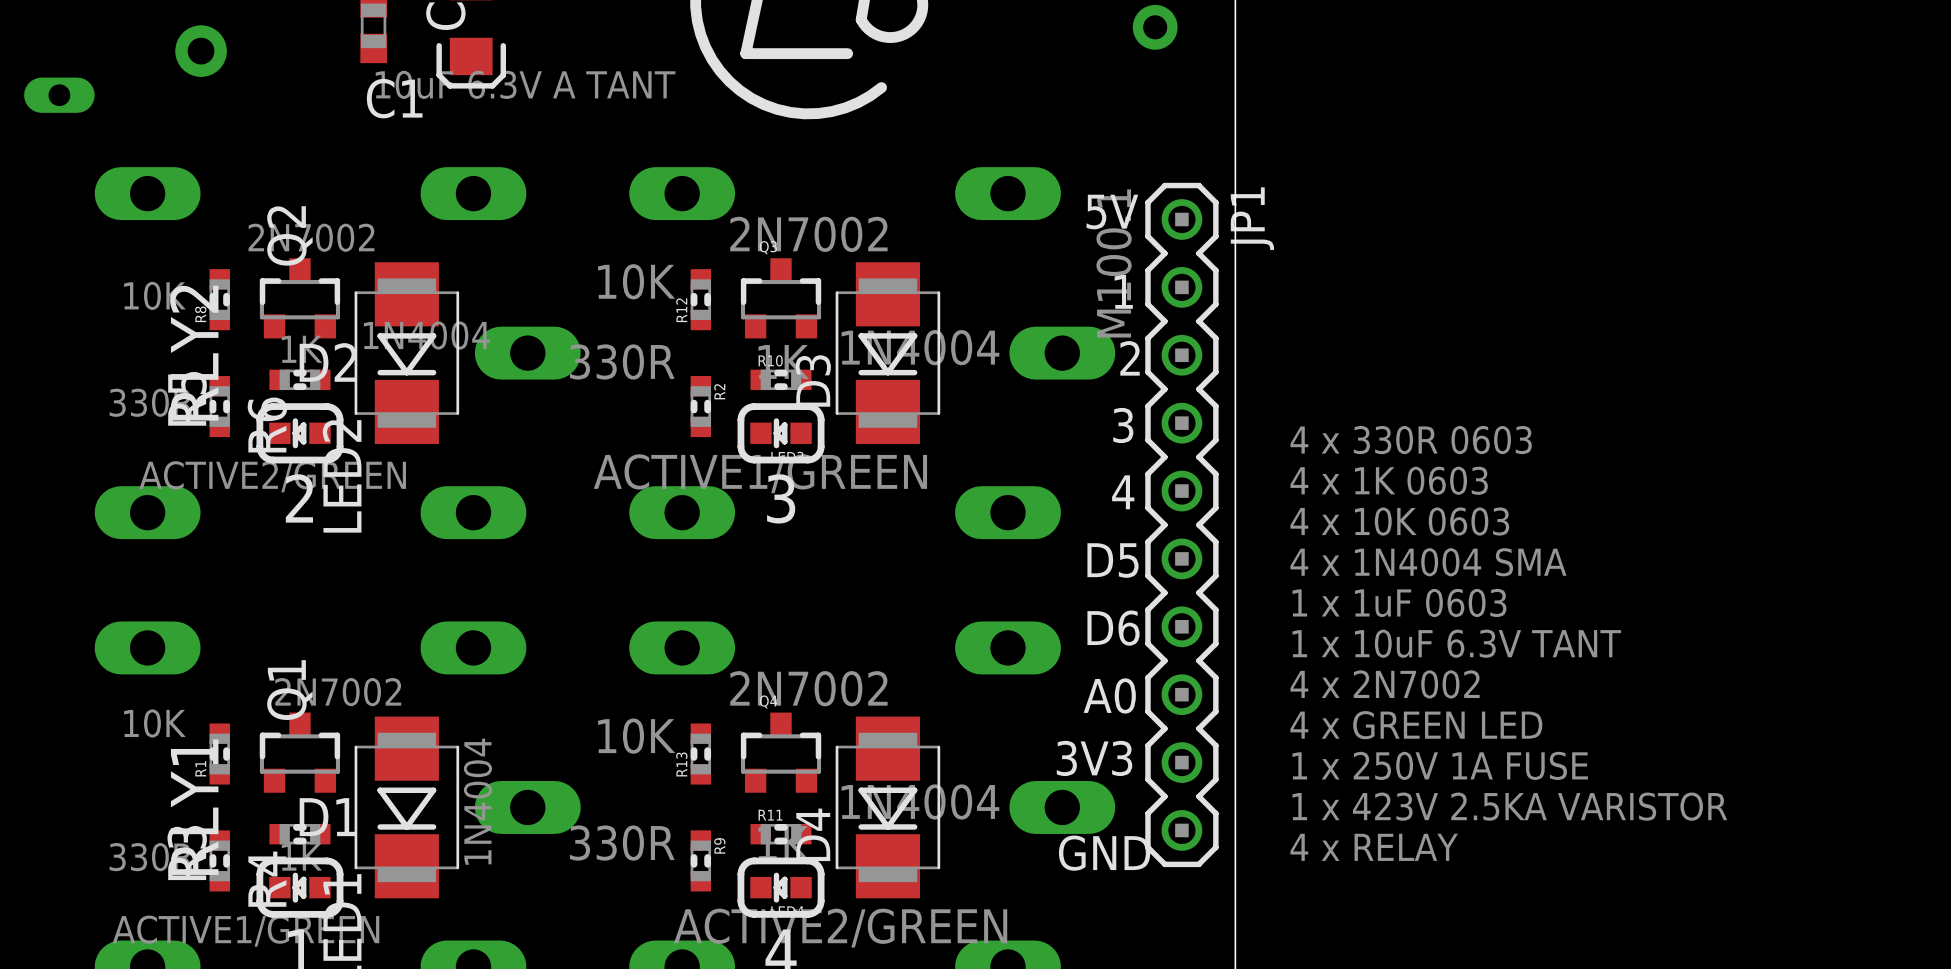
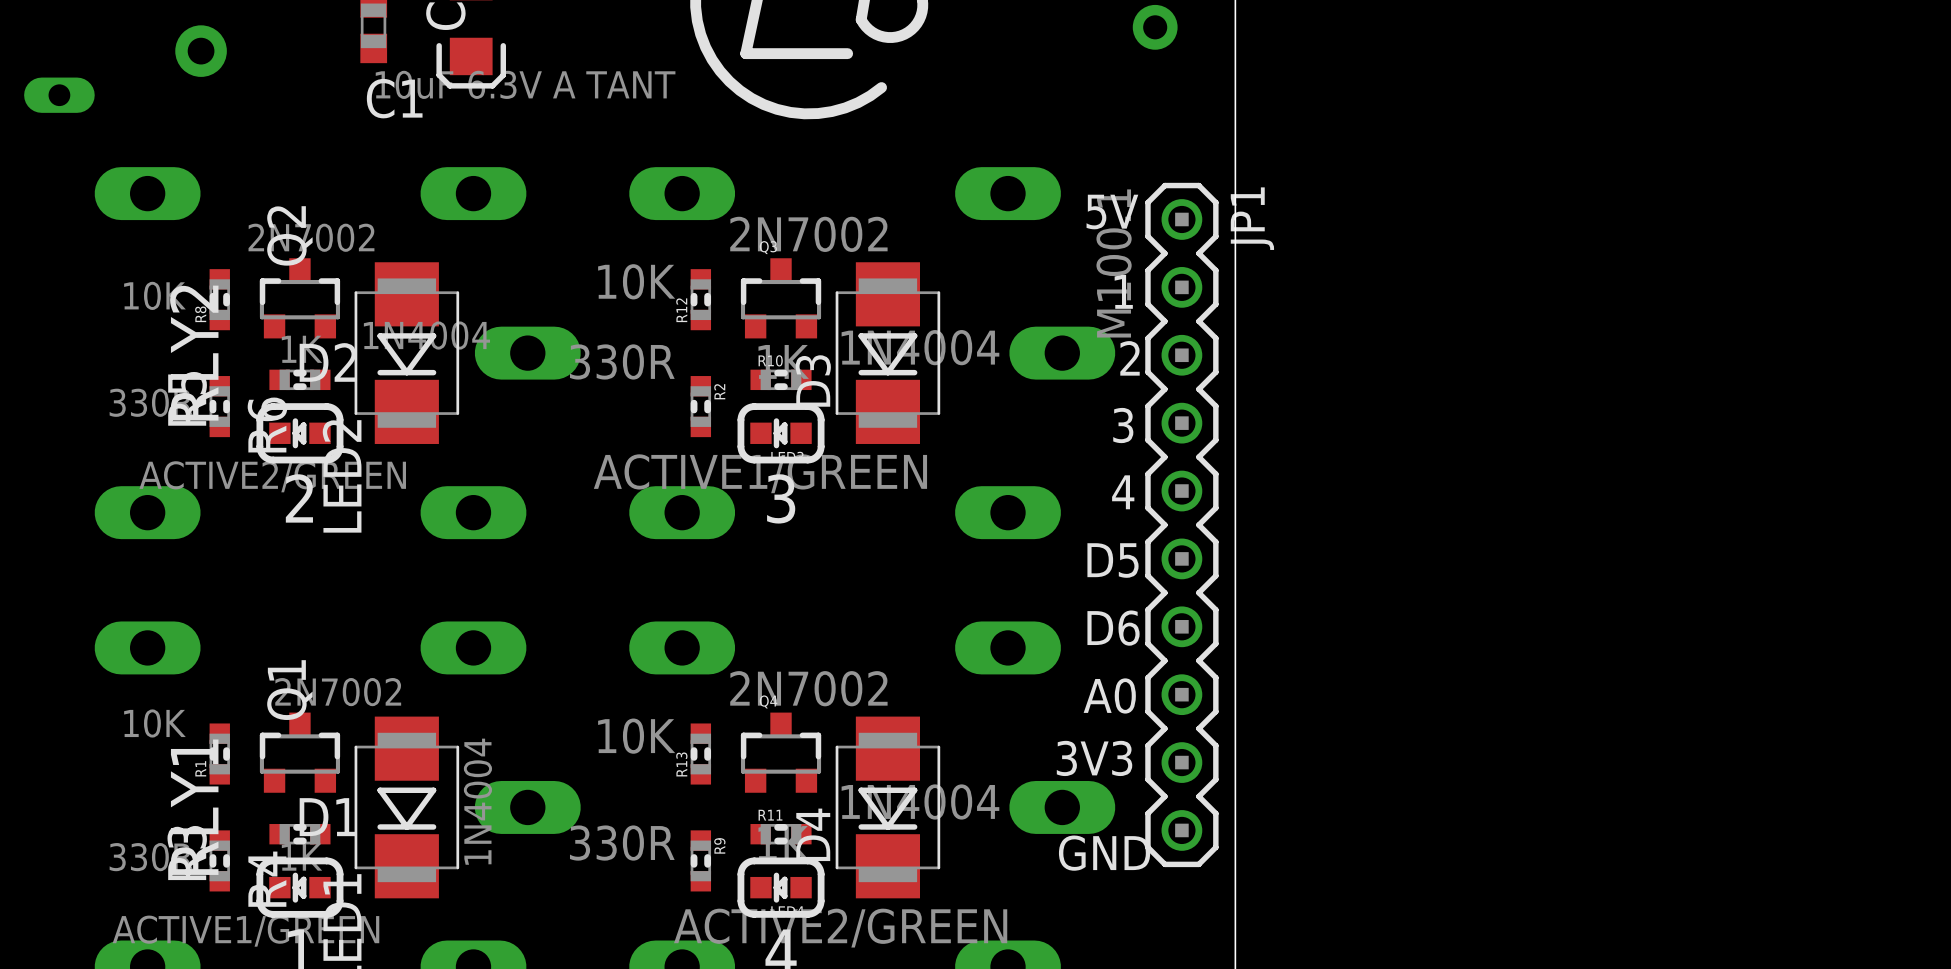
text: 4 x 330R 0603 (1411, 440) -> none
text: 4 x 1K 0603 (1389, 480) -> none
text: 4 x 10K 0603 (1399, 521) -> none
text: 4 x 1N4004 SMA (1428, 562) -> none
text: 1 x 1uF 0603 (1399, 602) -> none
text: 1 x 10uF 6.3V TANT (1456, 643) -> none
text: 4 x 2N7002 (1385, 684) -> none
text: 4 x GREEN LED (1416, 725) -> none
text: 1 x 250V 1A FUSE (1440, 765) -> none
text: 1 x 423V 2.5KA VARISTOR (1509, 806) -> none
text: 4 x RELAY (1374, 847) -> none

